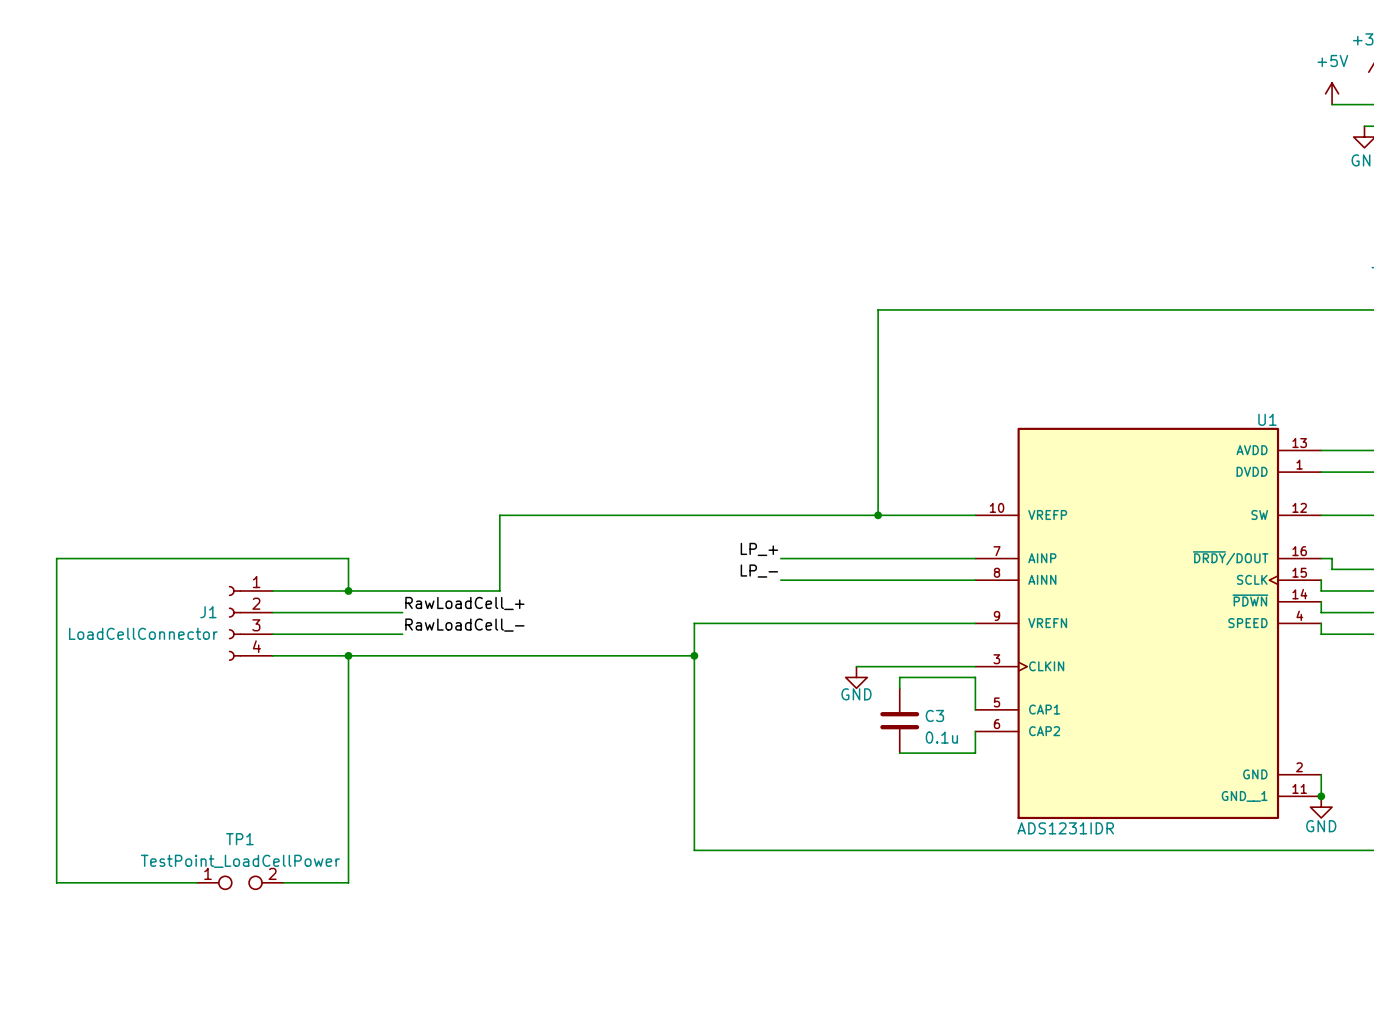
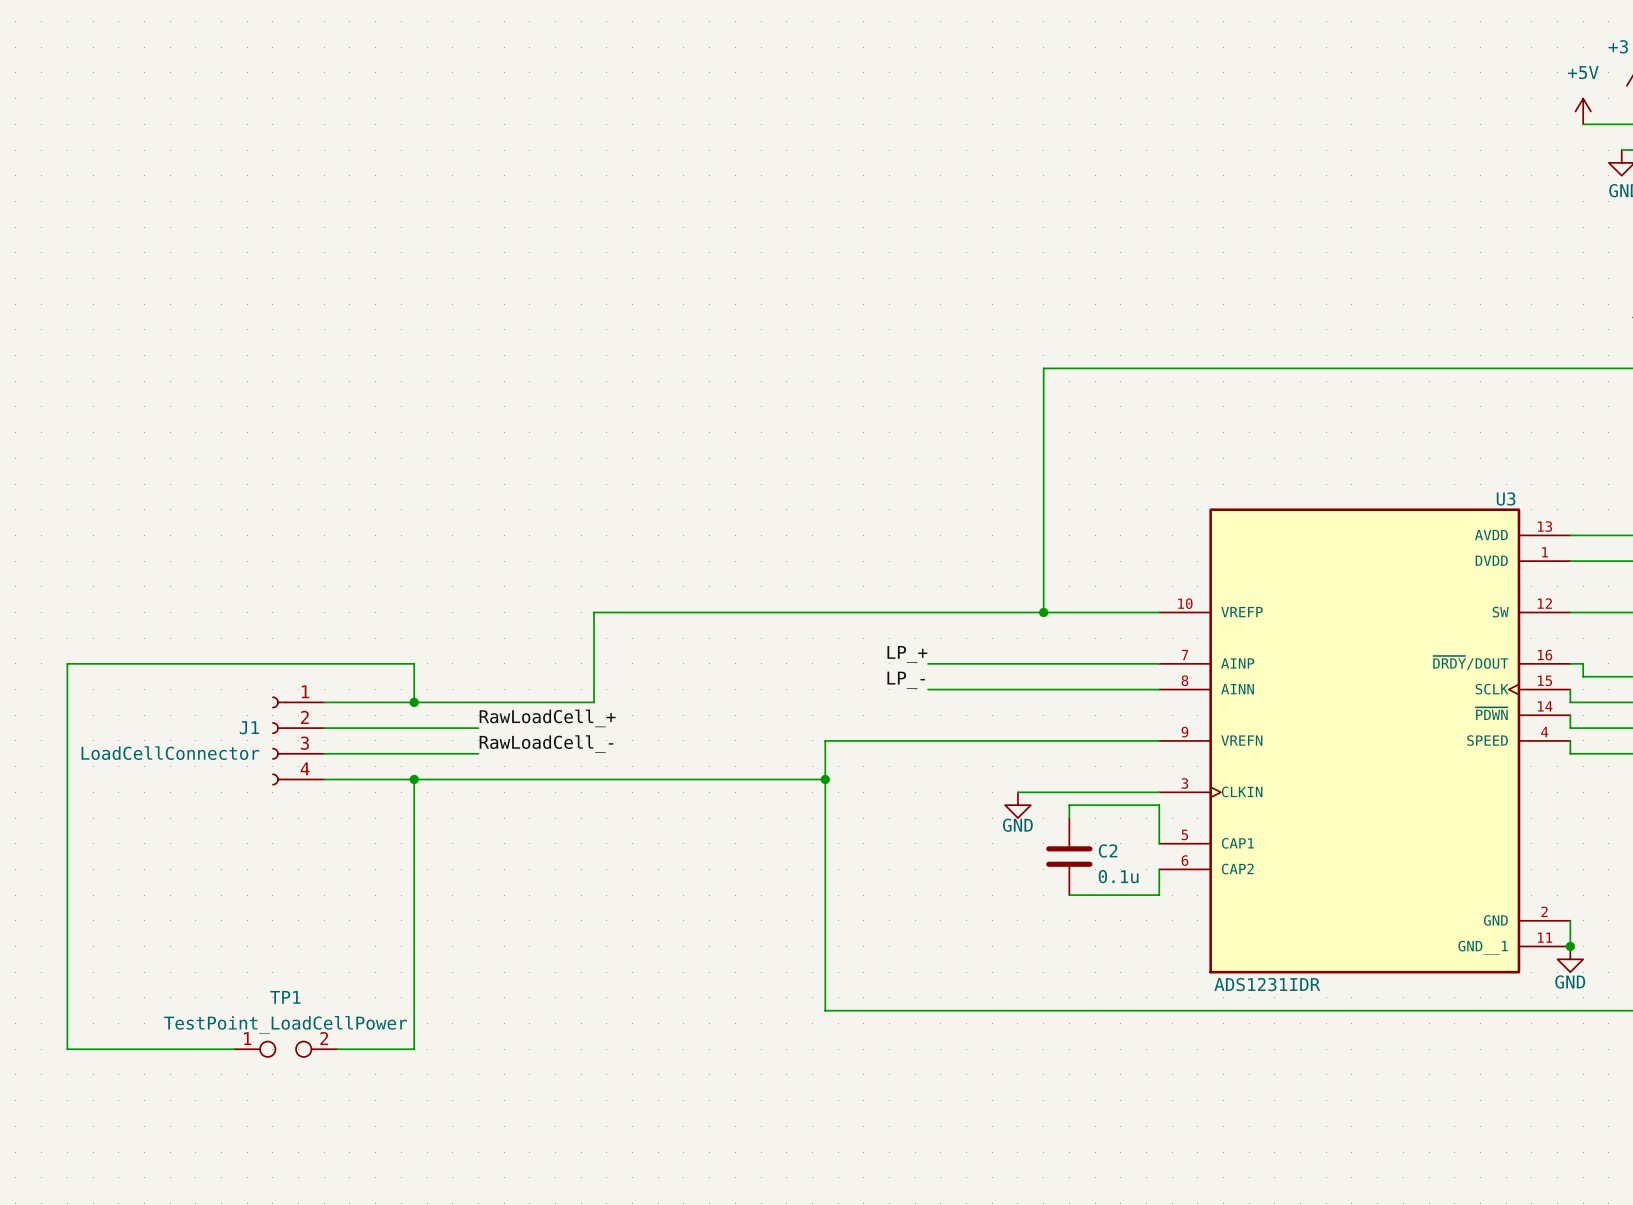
U1 name: U1 (1267, 419) -> U3 (1506, 498)
C3 name: C3 (934, 715) -> C2 (1108, 850)

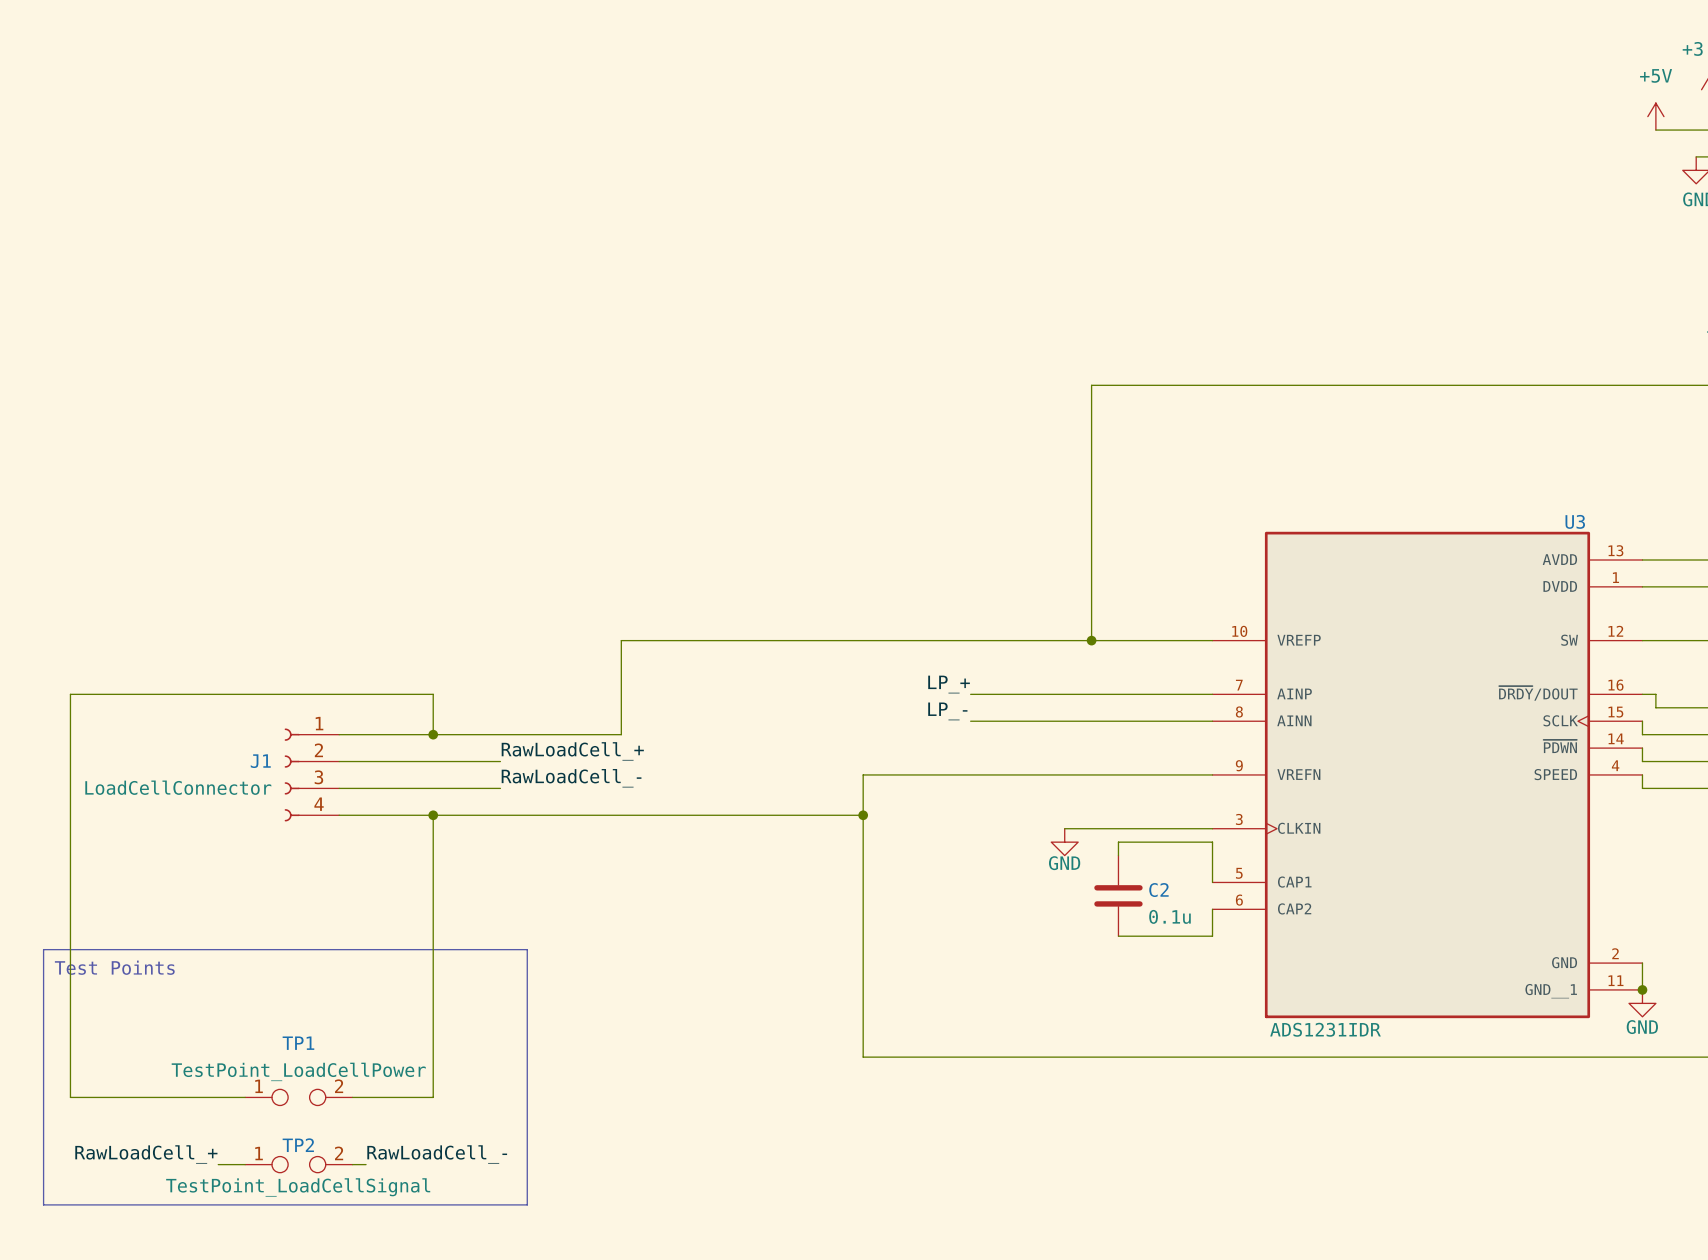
line: none -> (43, 949) (527, 949) (527, 1204) (43, 1204) (43, 949)
text: none -> Test Points (114, 967)
label: none -> RawLoadCell_+ (146, 1154)
label: none -> RawLoadCell_- (437, 1154)
wire: none -> (218, 1164) (245, 1164)
TP2: none -> TestPoint_LoadCellSignal (298, 1164)
wire: none -> (352, 1164) (366, 1164)

